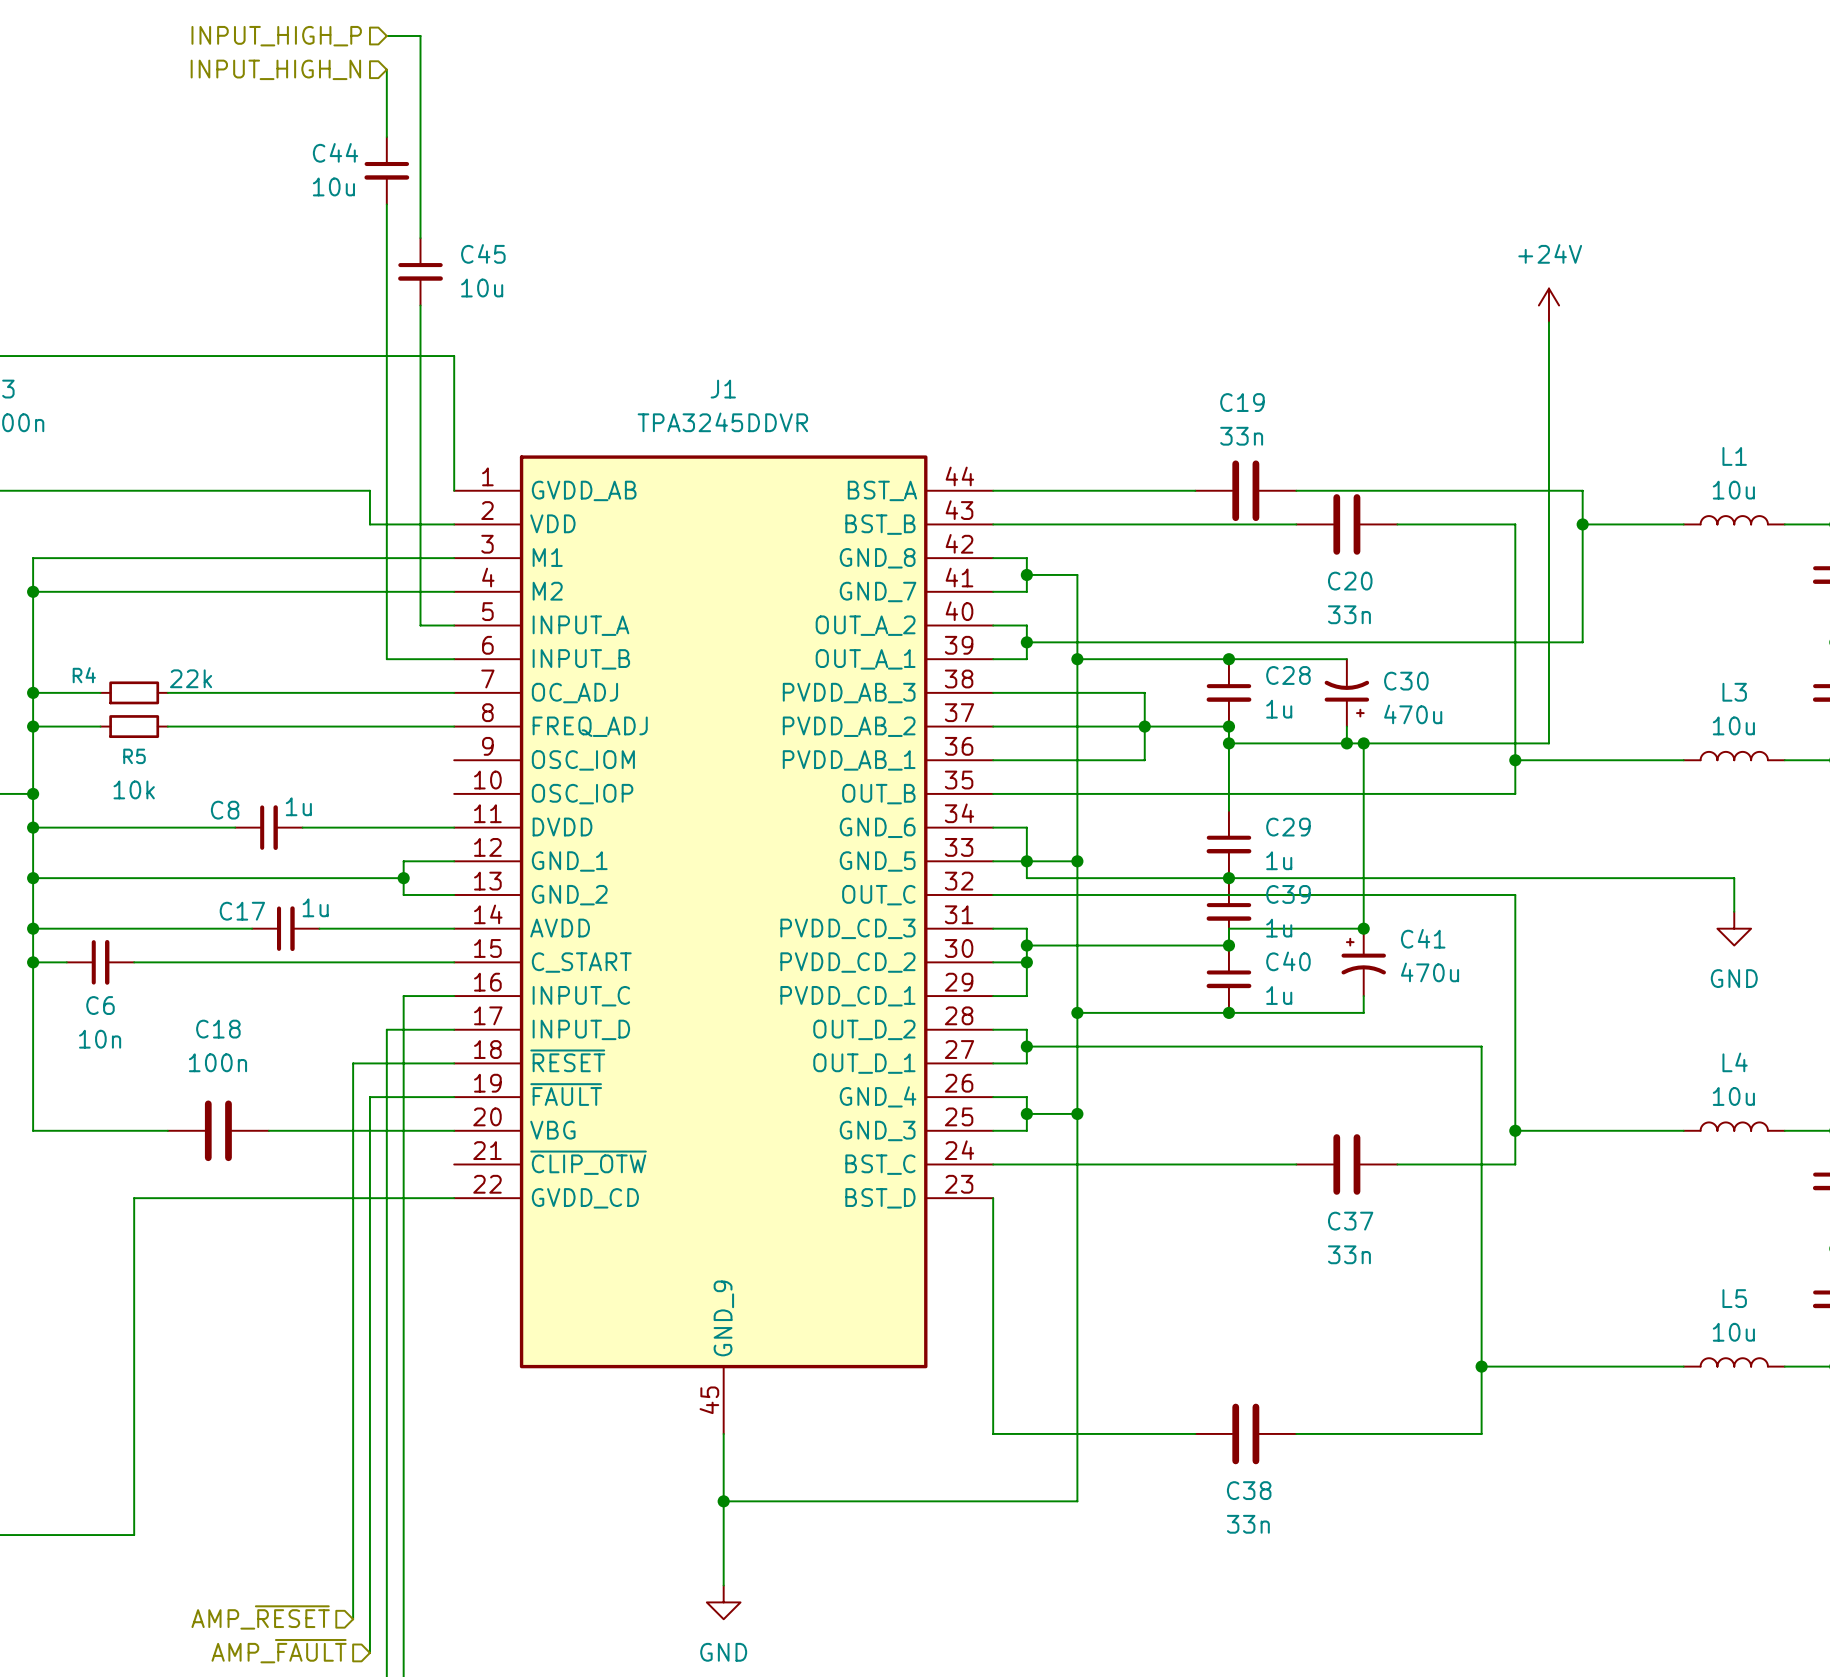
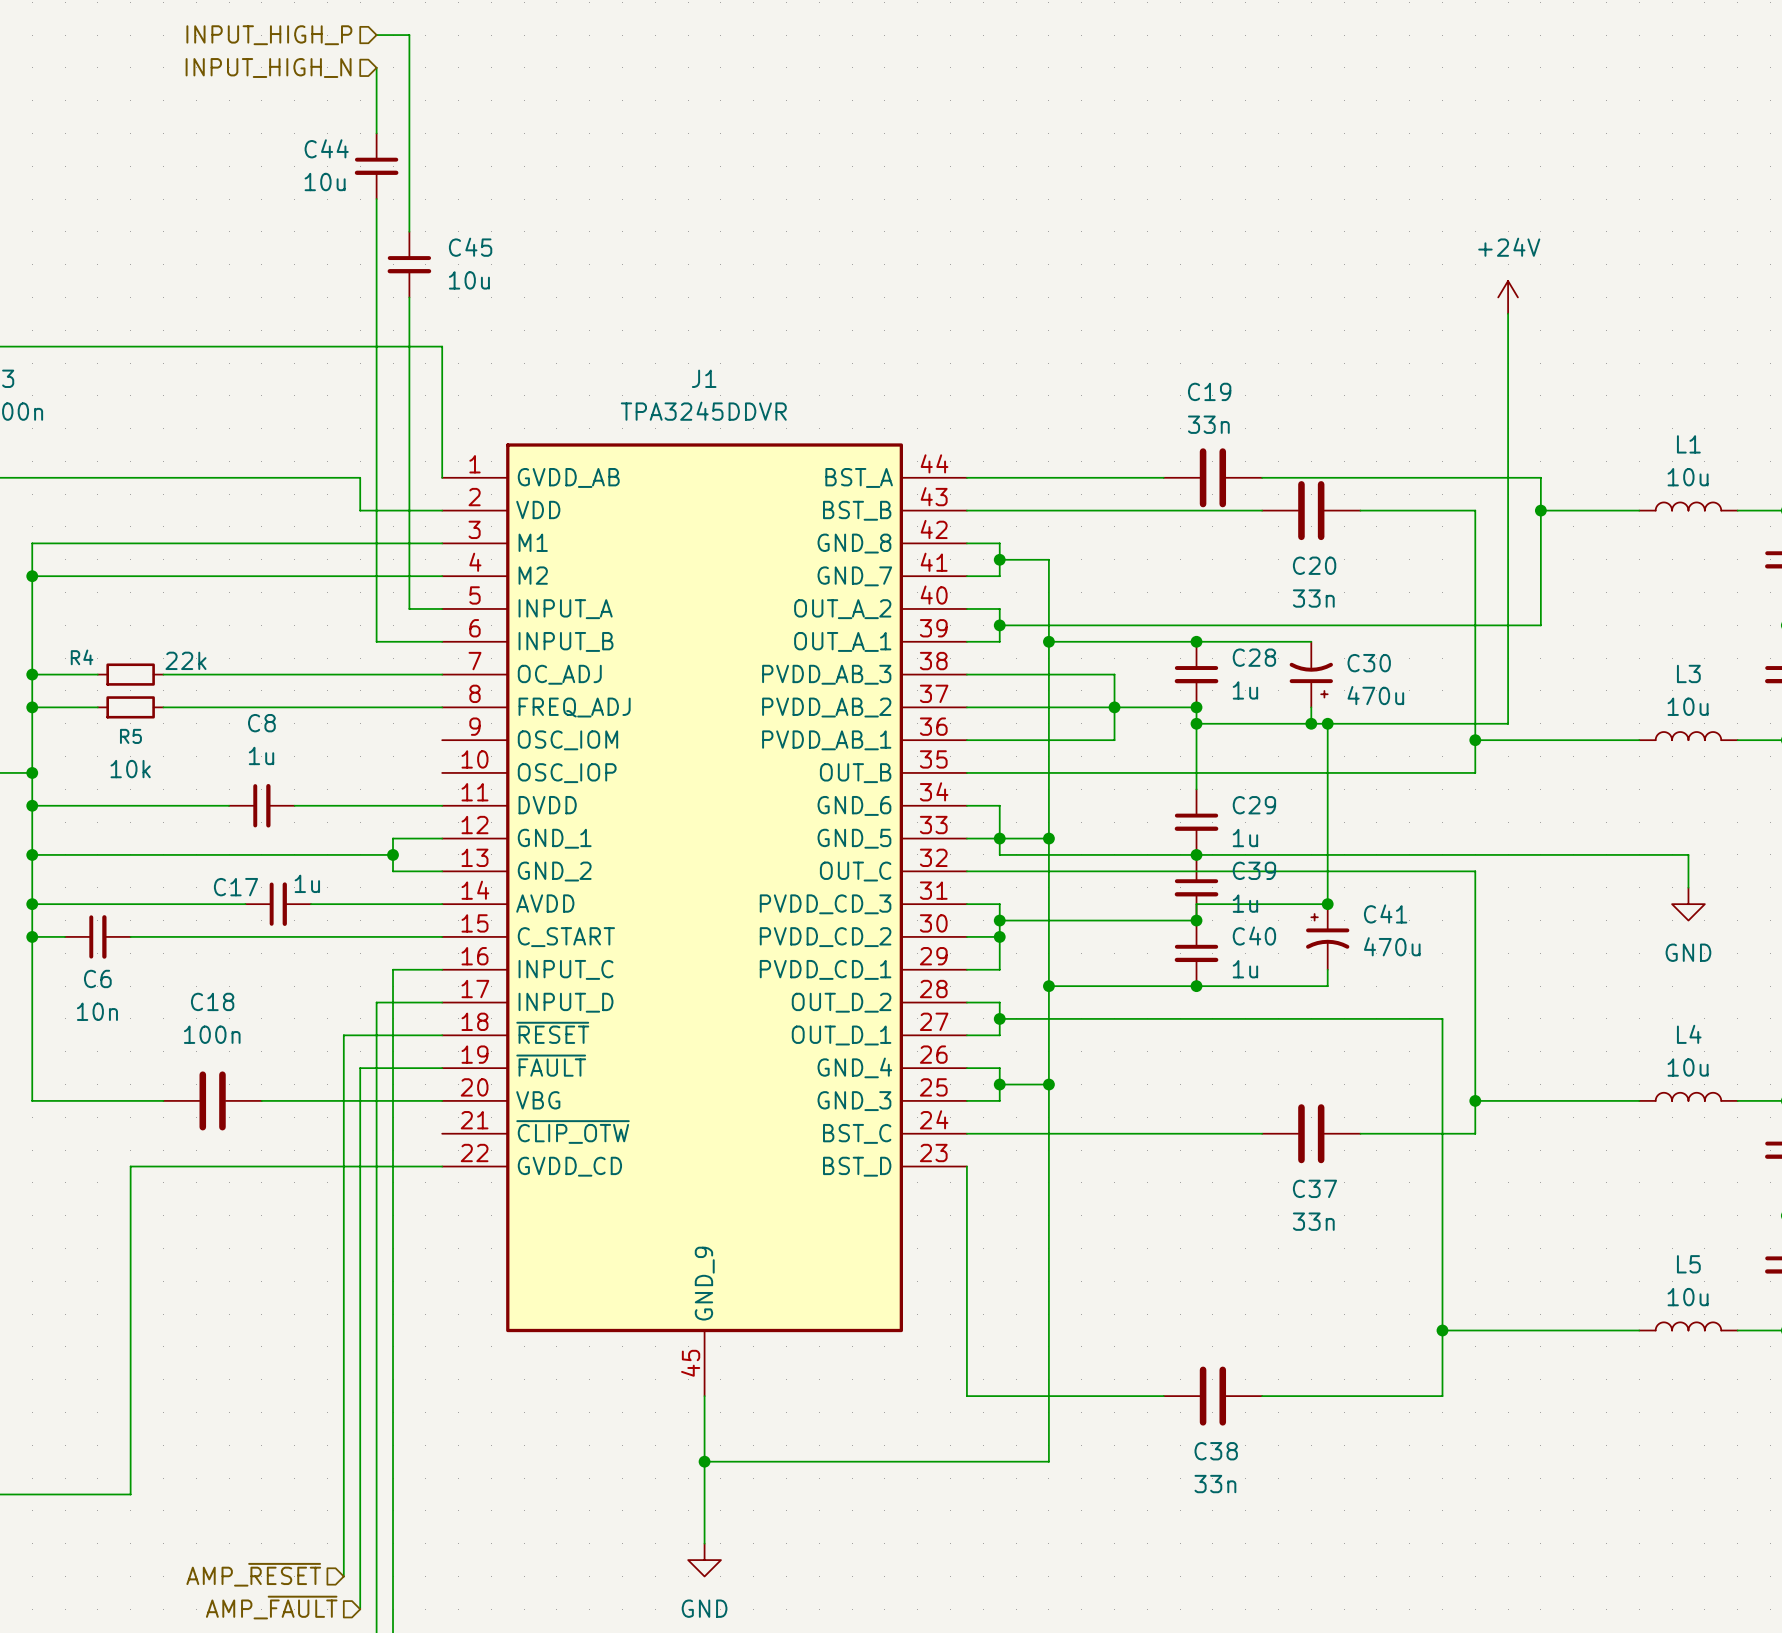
C8 value position: 1u (298, 806) -> 1u (261, 755)
C8 name position: C8 (225, 810) -> C8 (261, 723)

